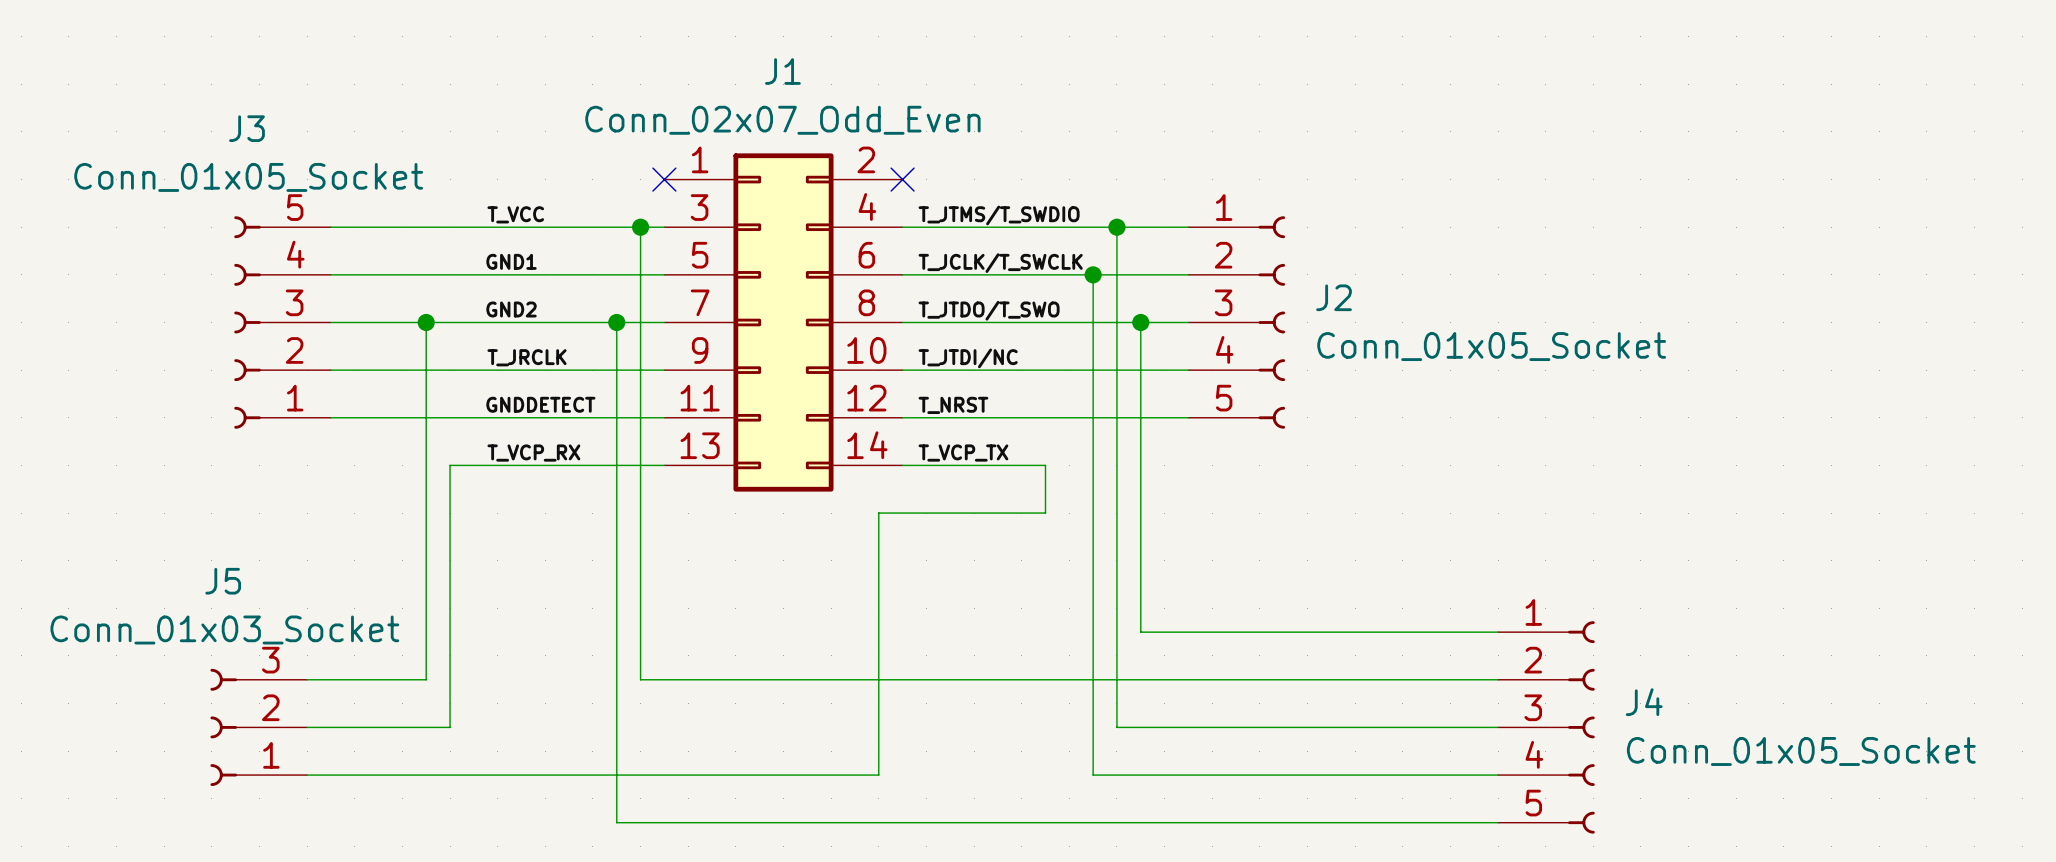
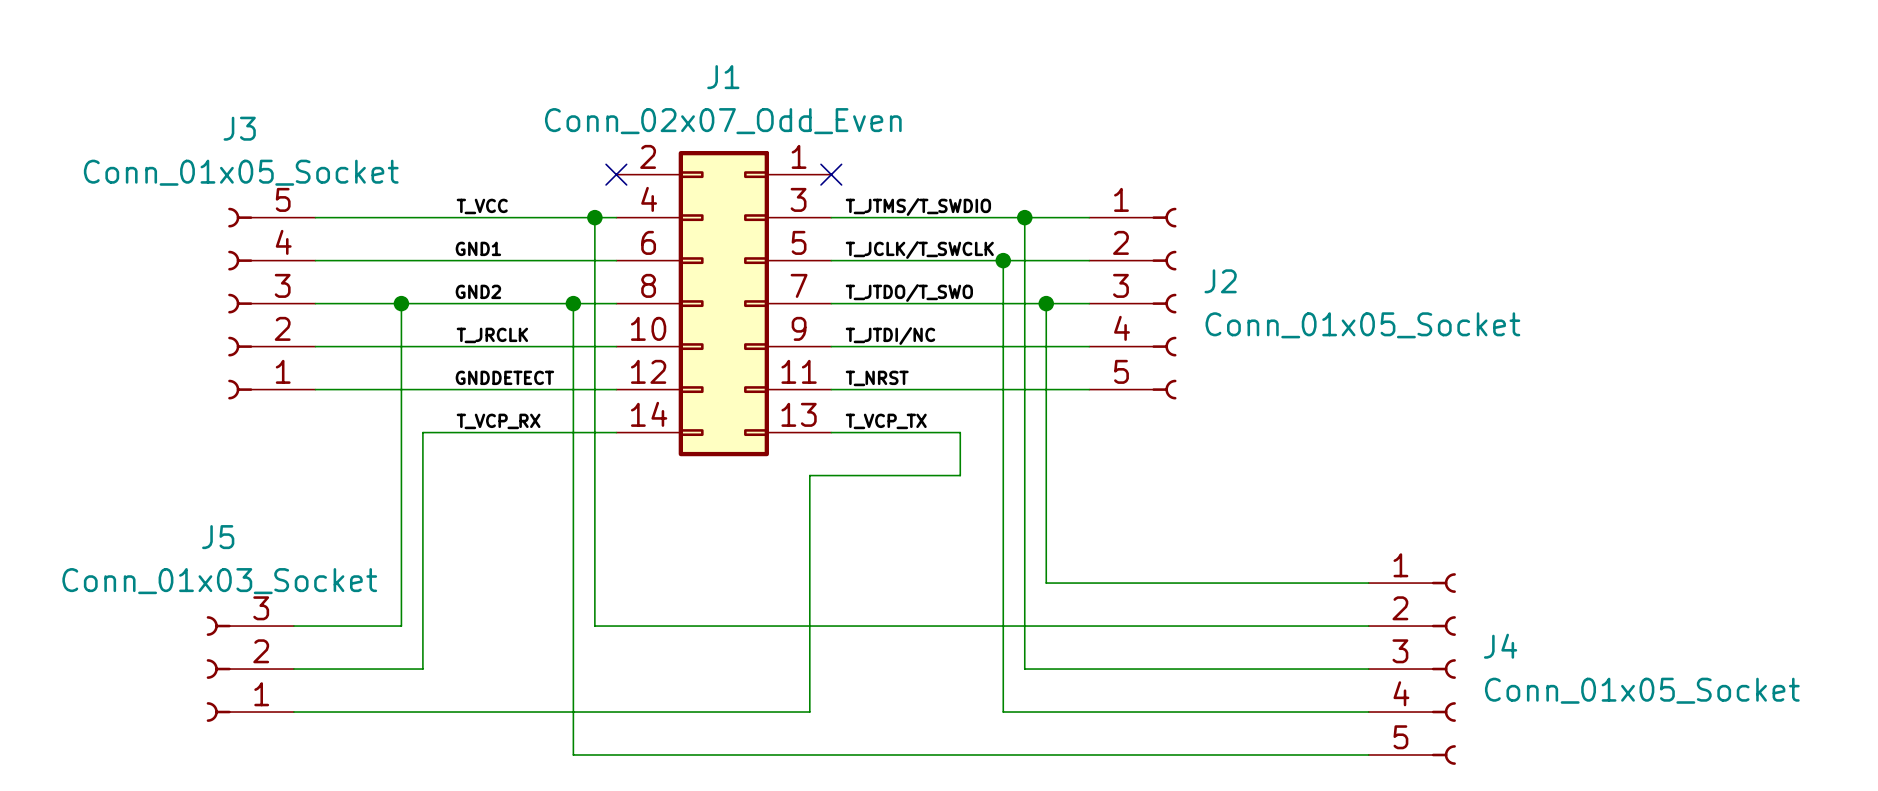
J1 flip: as is (783, 322) -> left-right (723, 303)

